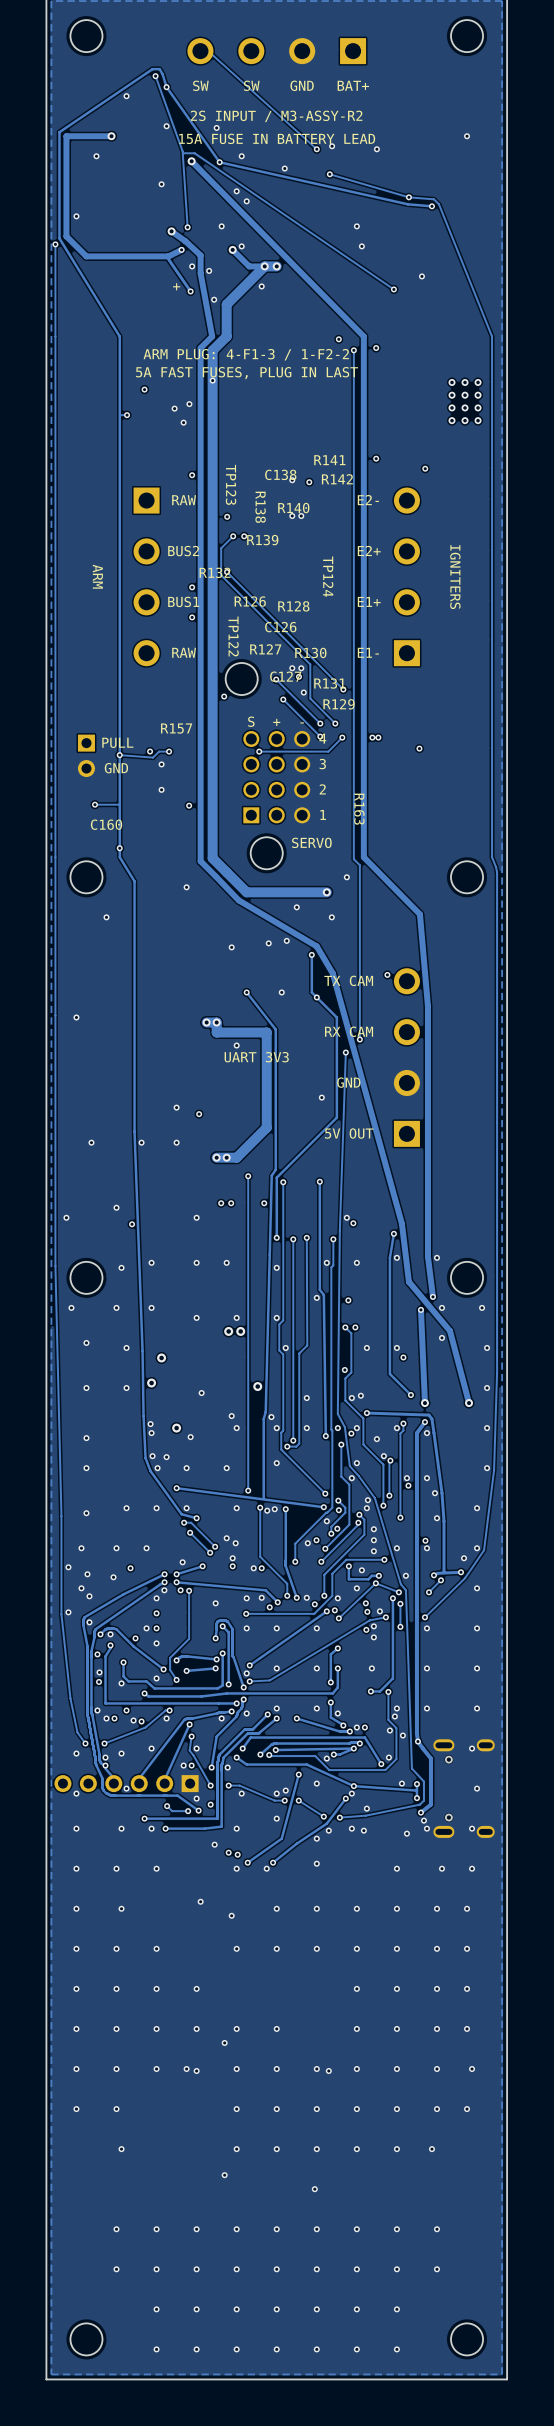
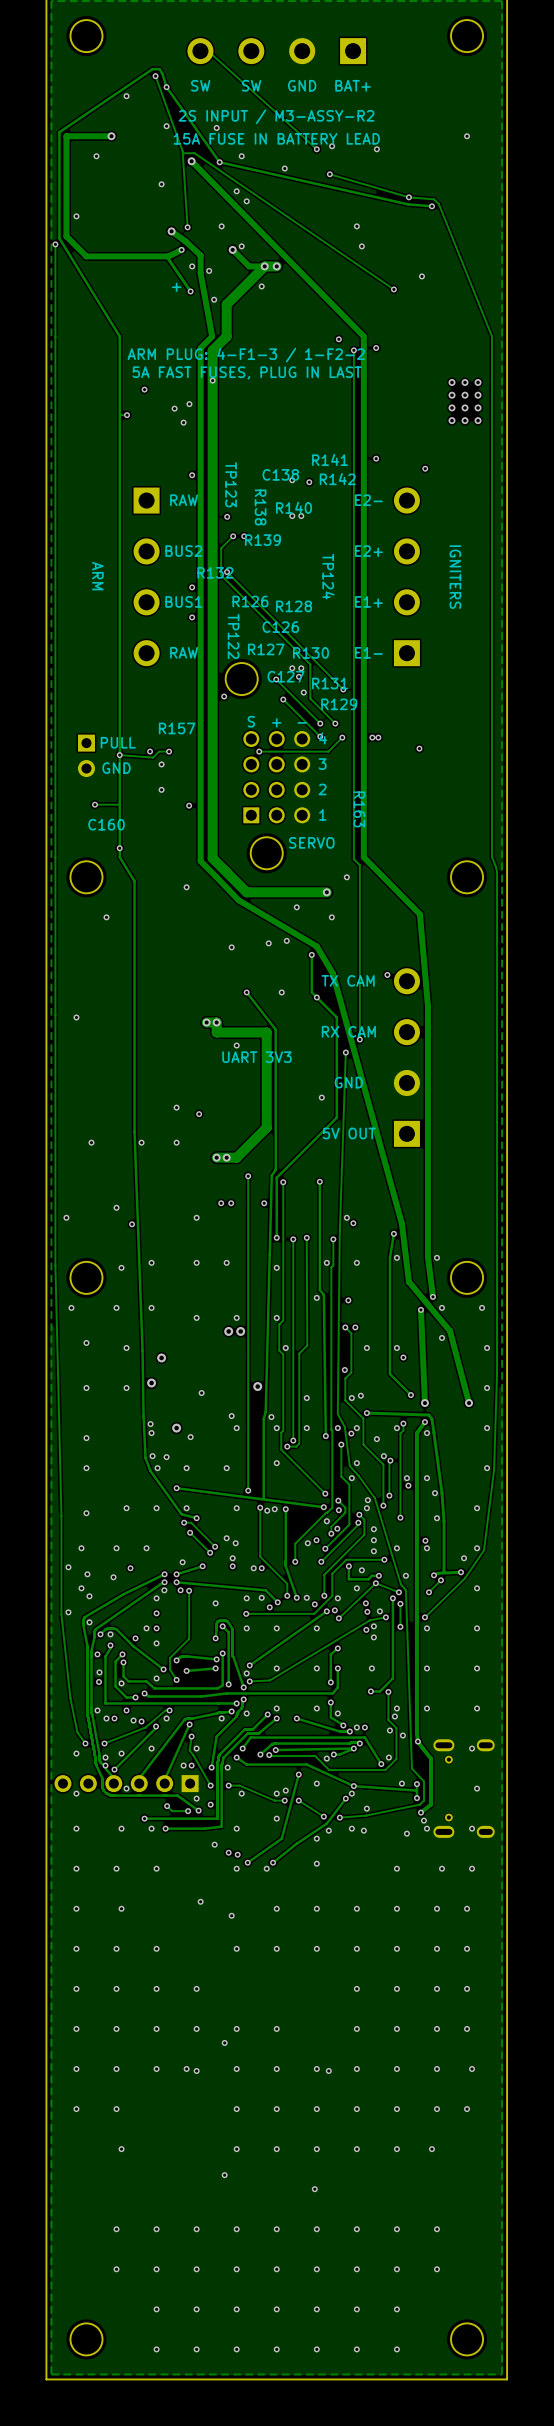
track: none -> (122, 1654) (115, 1661) (115, 1686) (126, 1697) (135, 1697)
via: none -> (122, 1654)
via: none -> (135, 1697)
track: none -> (156, 1726) (114, 1769)
via: none -> (156, 1726)
via: none -> (114, 1769)

